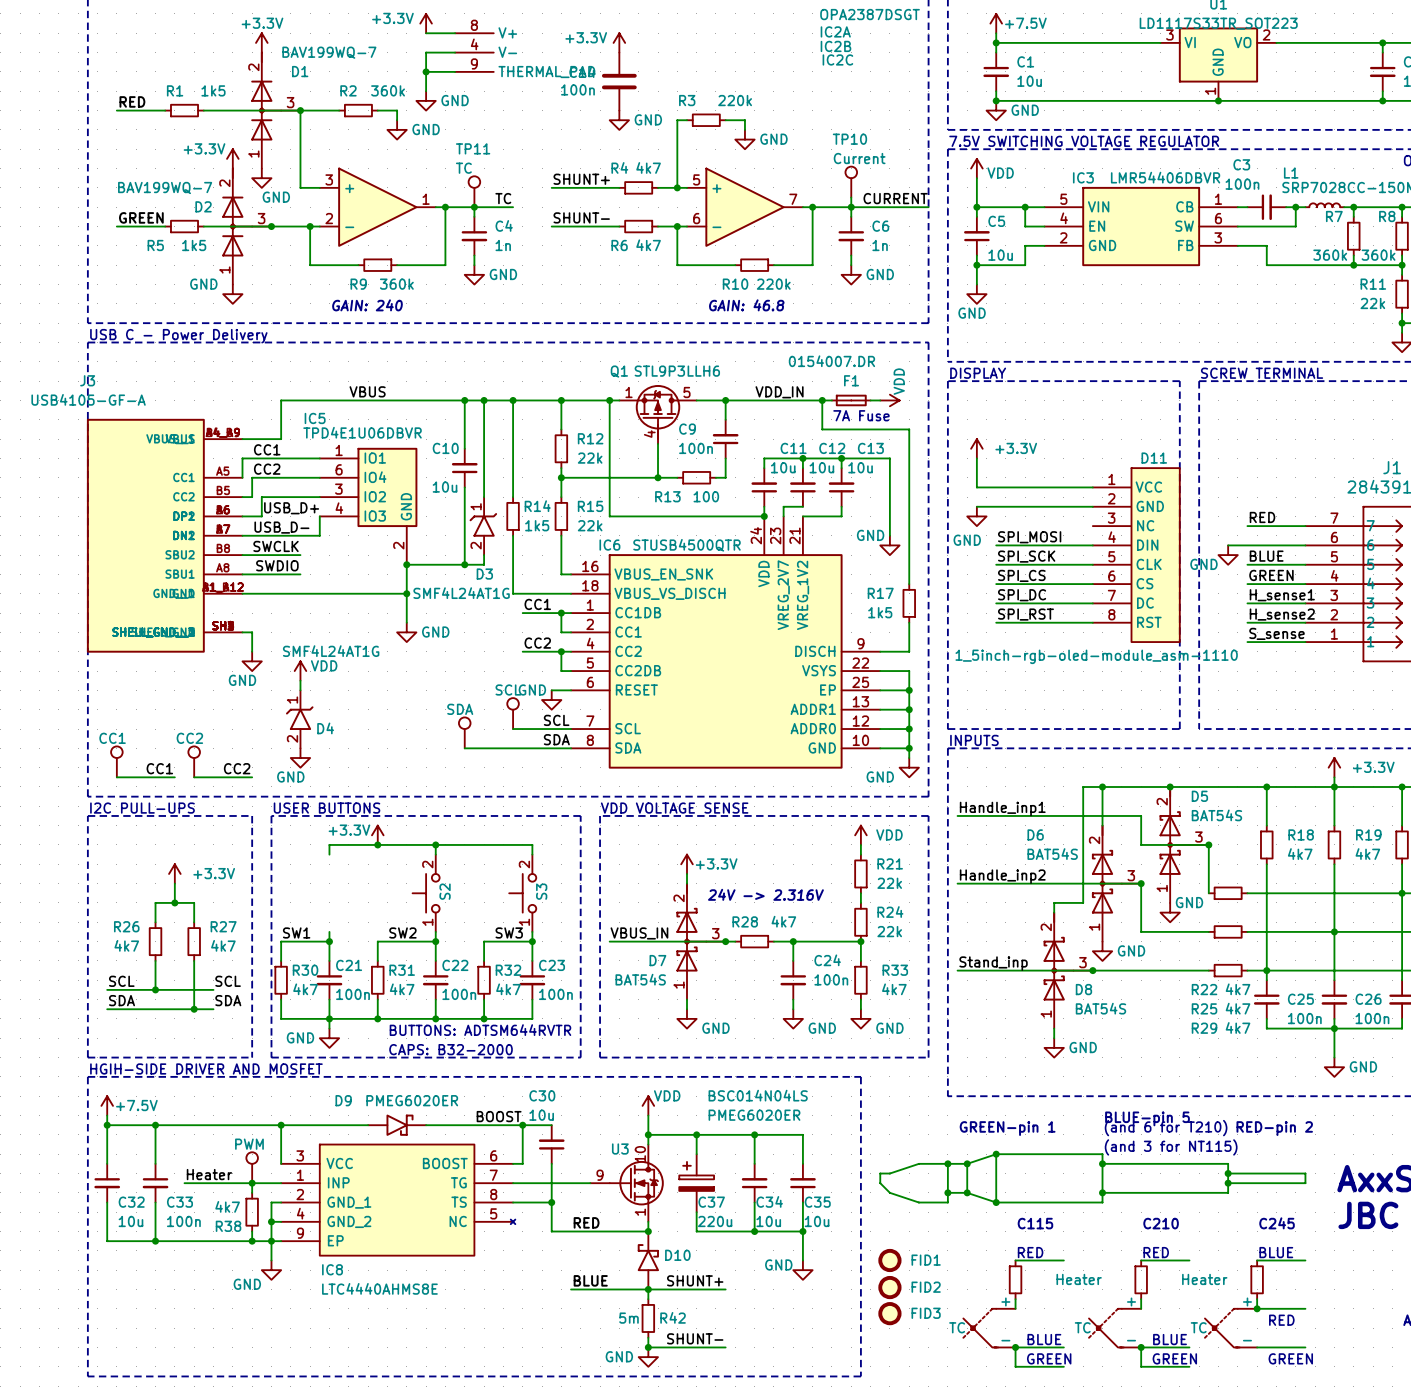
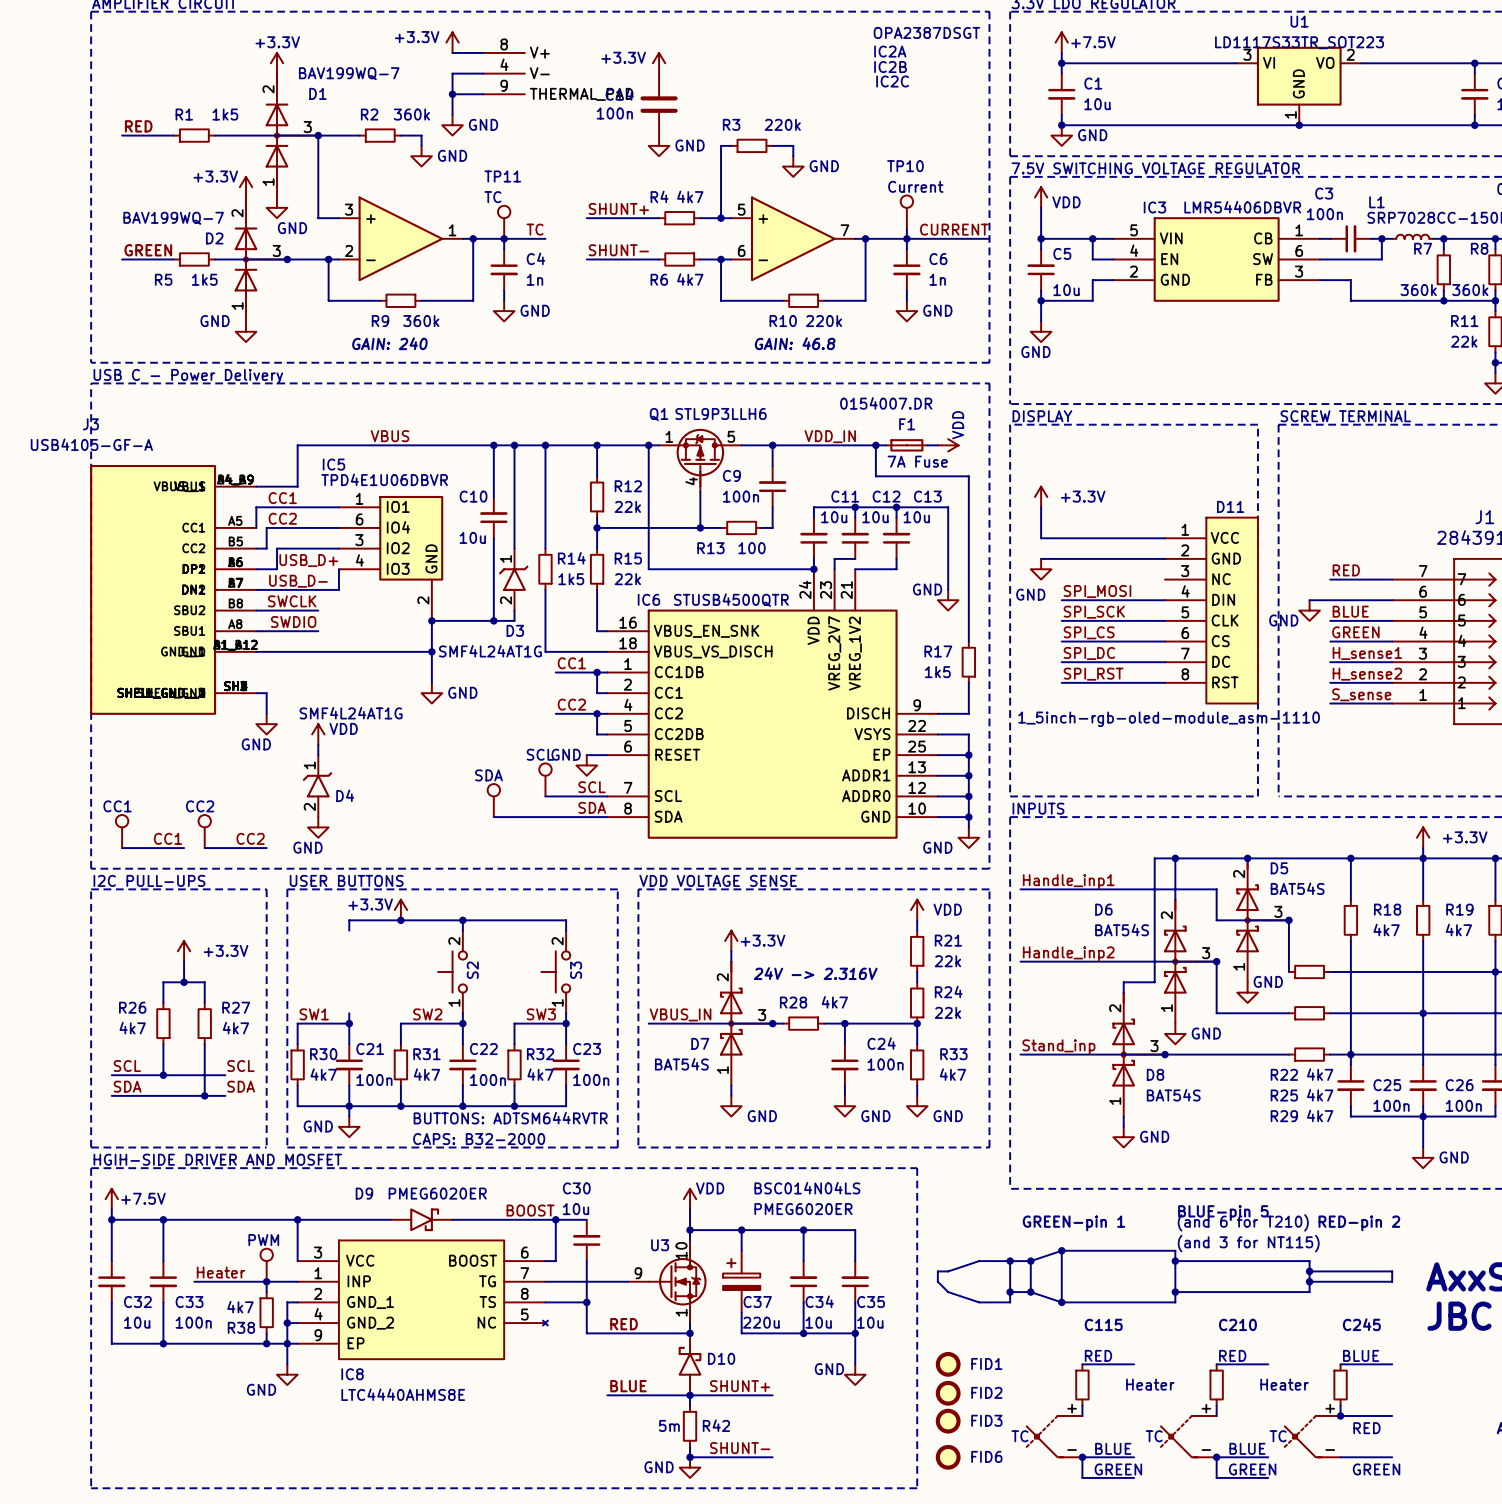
FID6: none -> (948, 1457)

